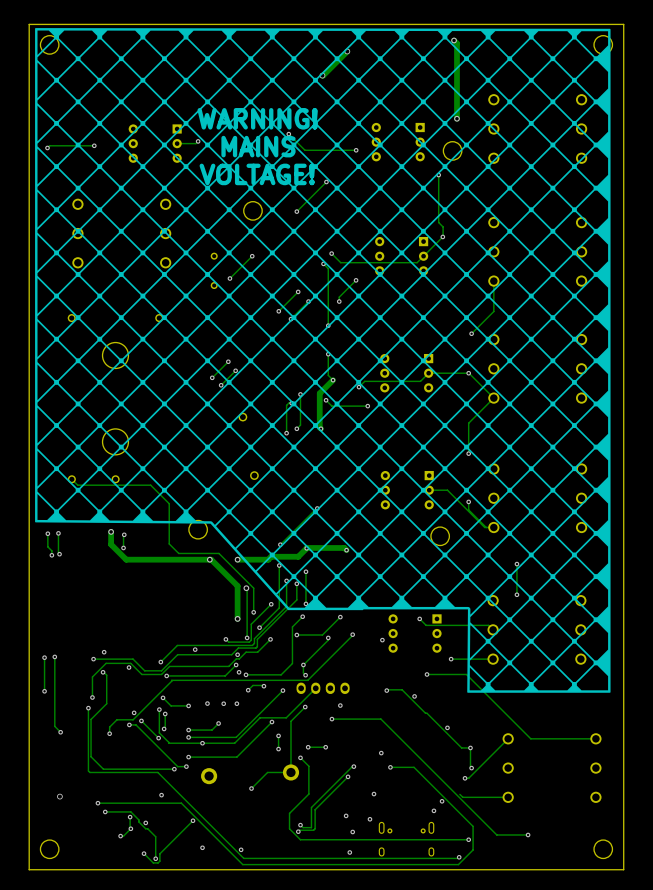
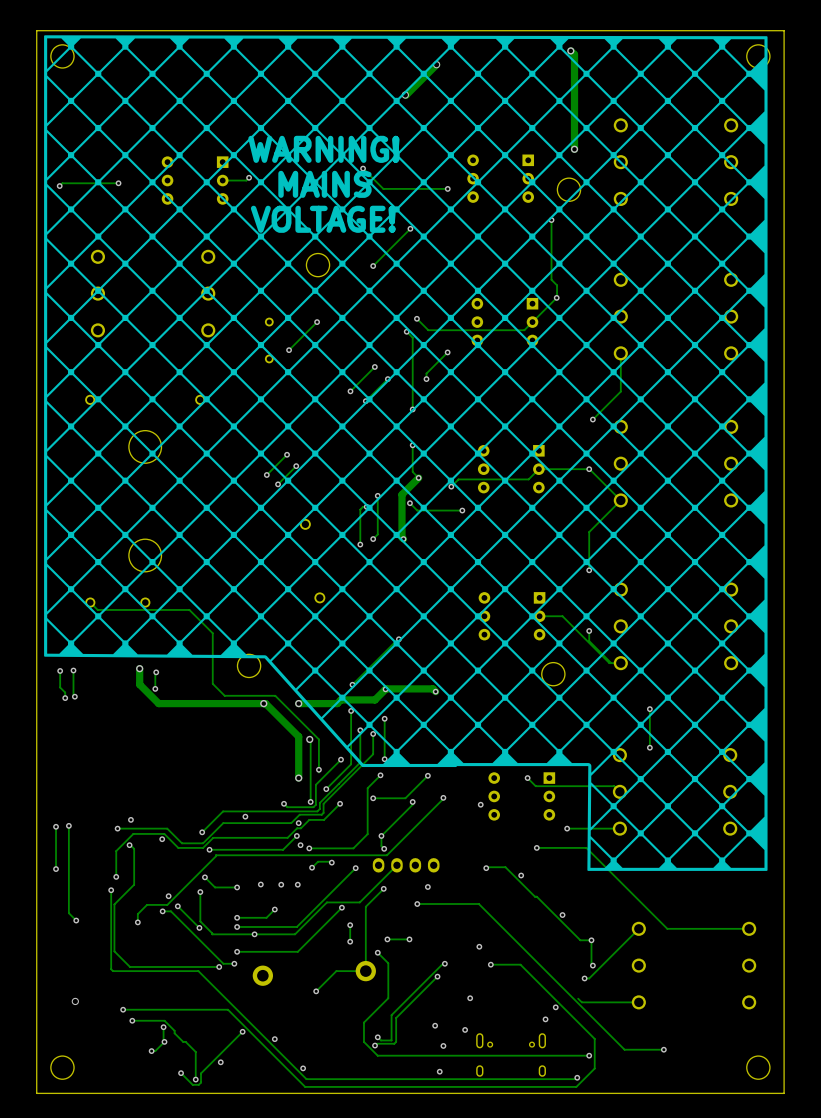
track: (165, 713) (164, 728) -> none
via: (165, 713) -> none
via: (164, 728) -> none
via: (161, 795) -> none
via: (145, 822) -> none
via: none -> (274, 1039)
via: none -> (220, 1062)
via: (202, 847) -> none

